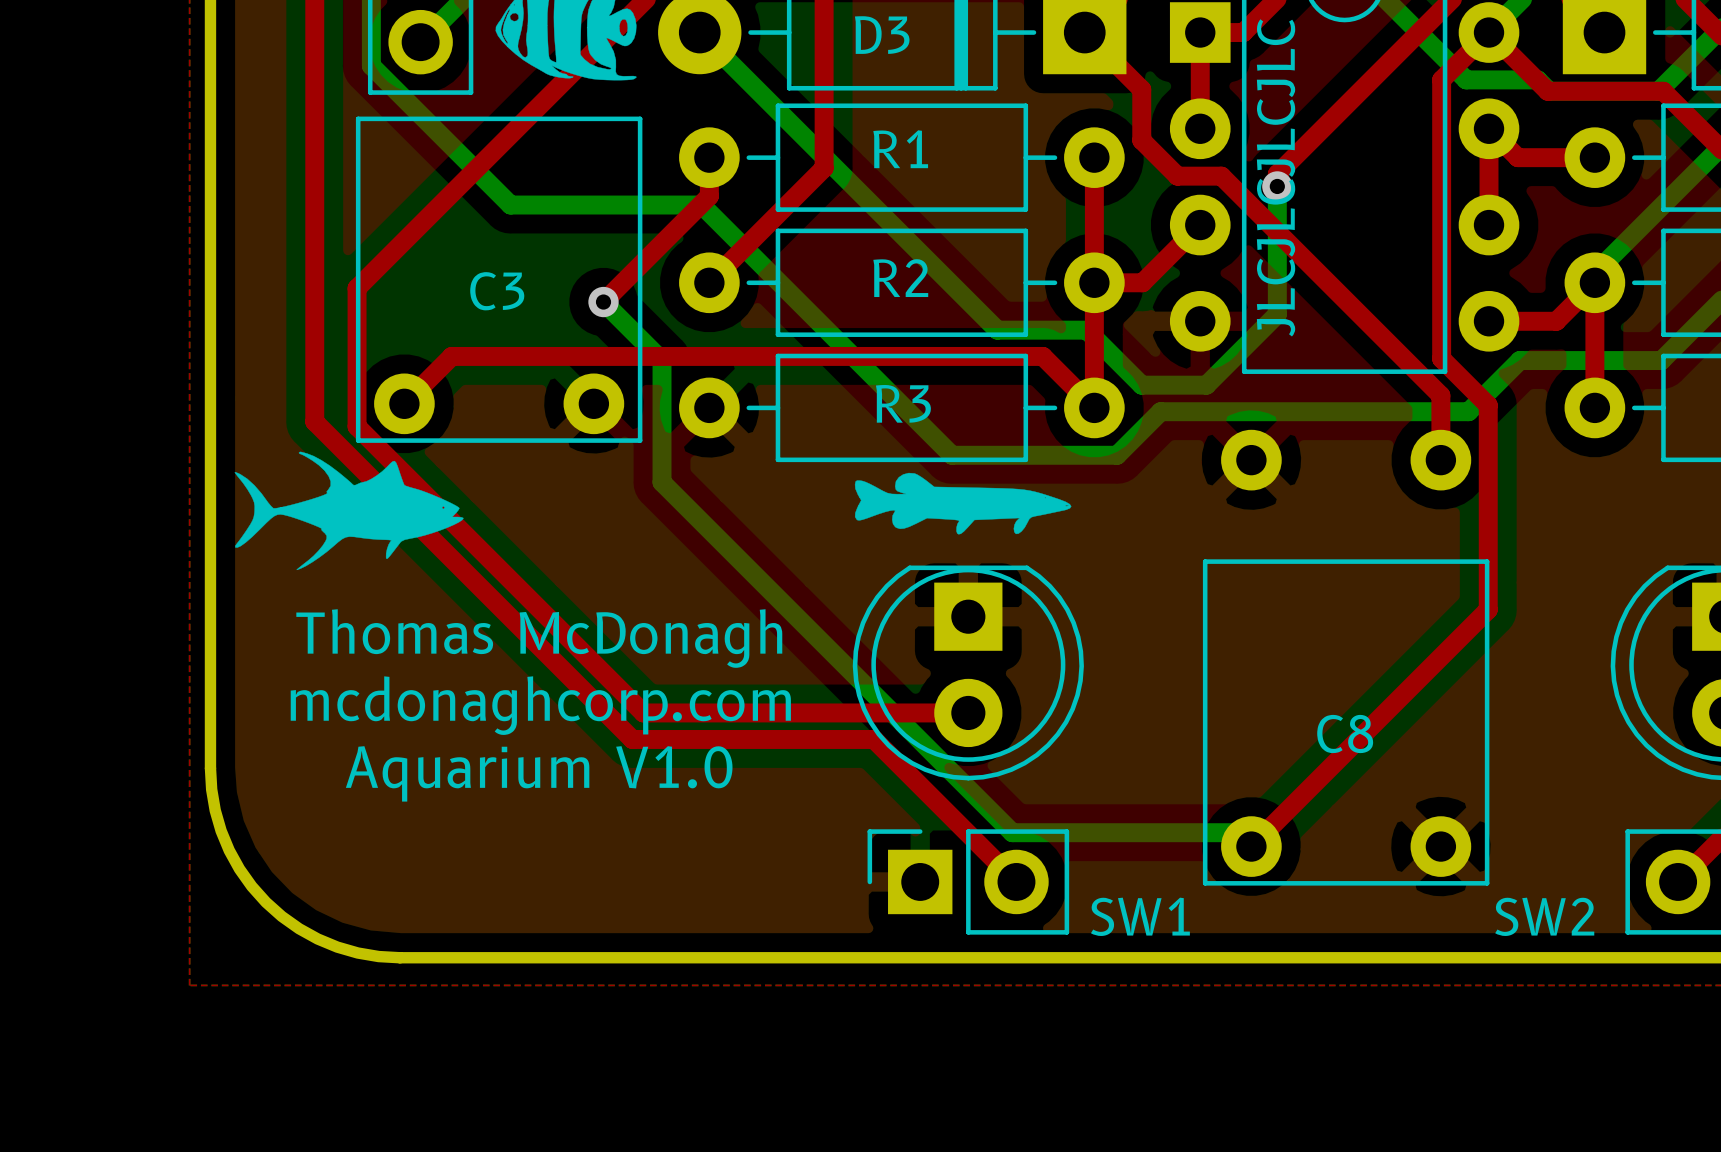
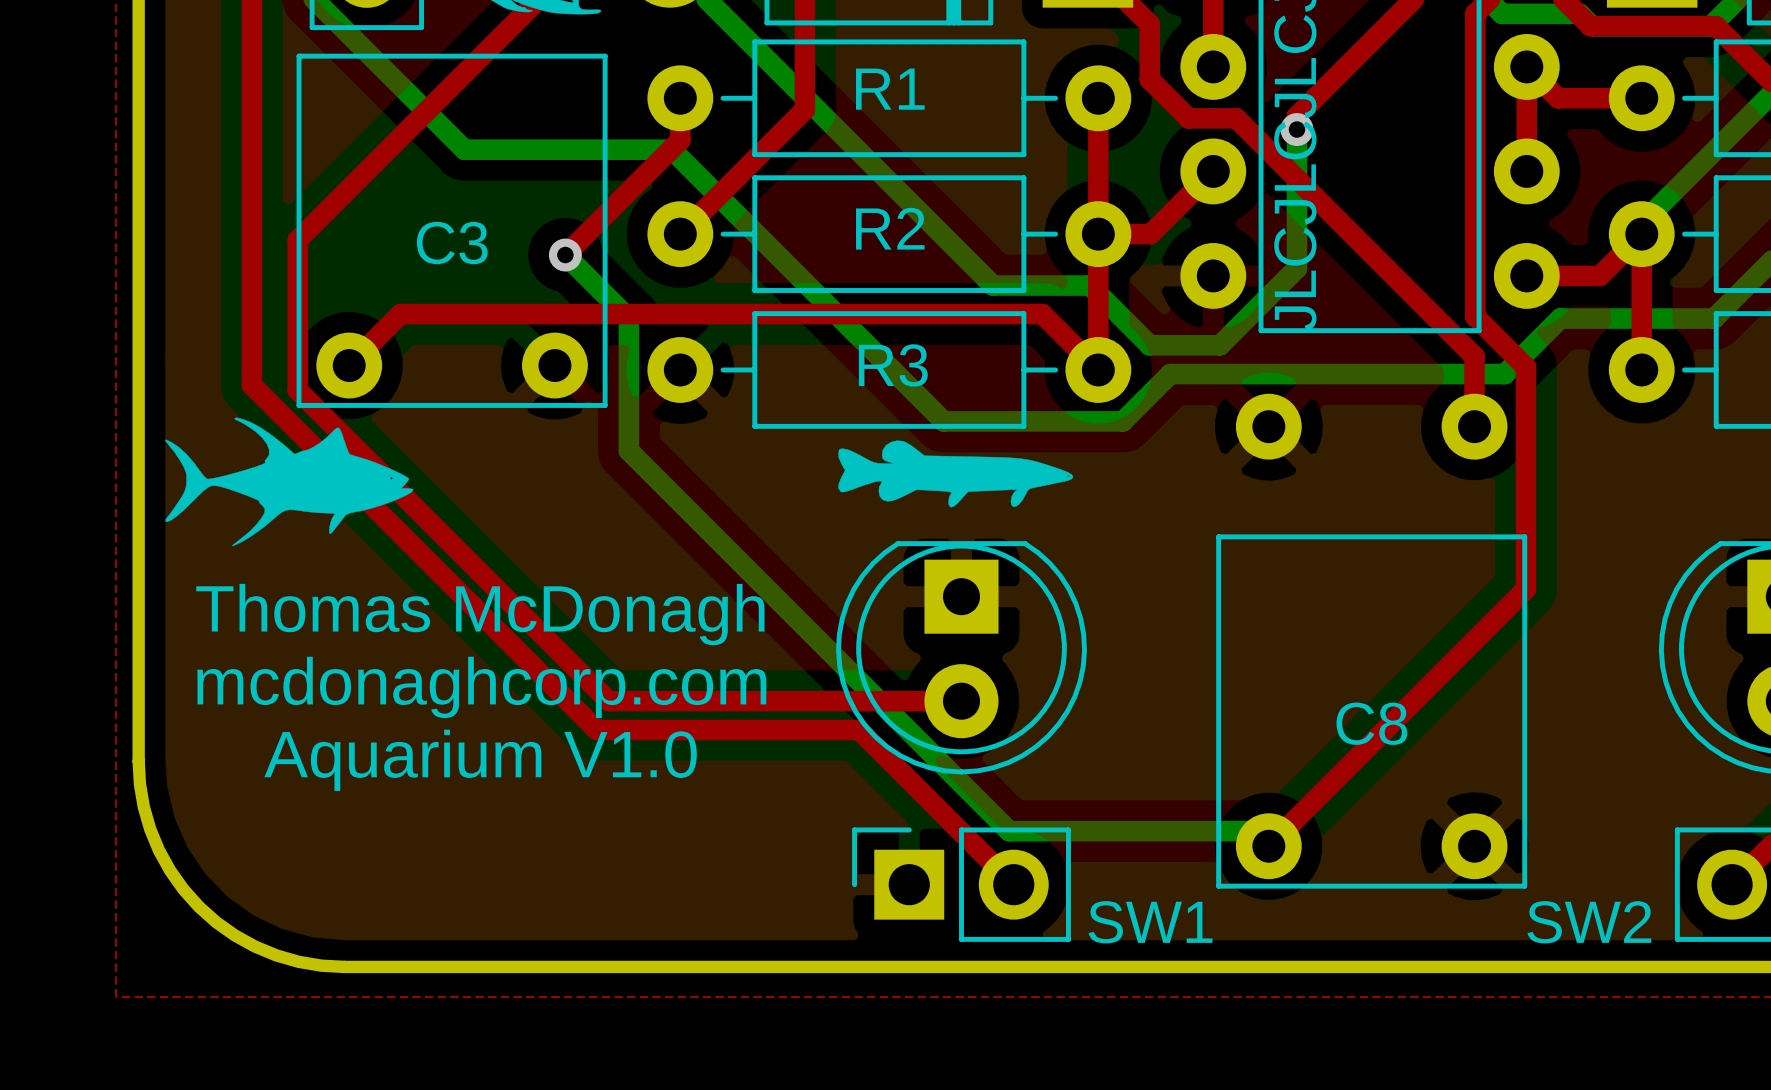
text position: Thomas McDonagh (539, 638) -> Thomas McDonagh (480, 614)
text position: mcdonaghcorp.com (540, 705) -> mcdonaghcorp.com (481, 687)
text position: Aquarium V1.0 (539, 773) -> Aquarium V1.0 (480, 760)

